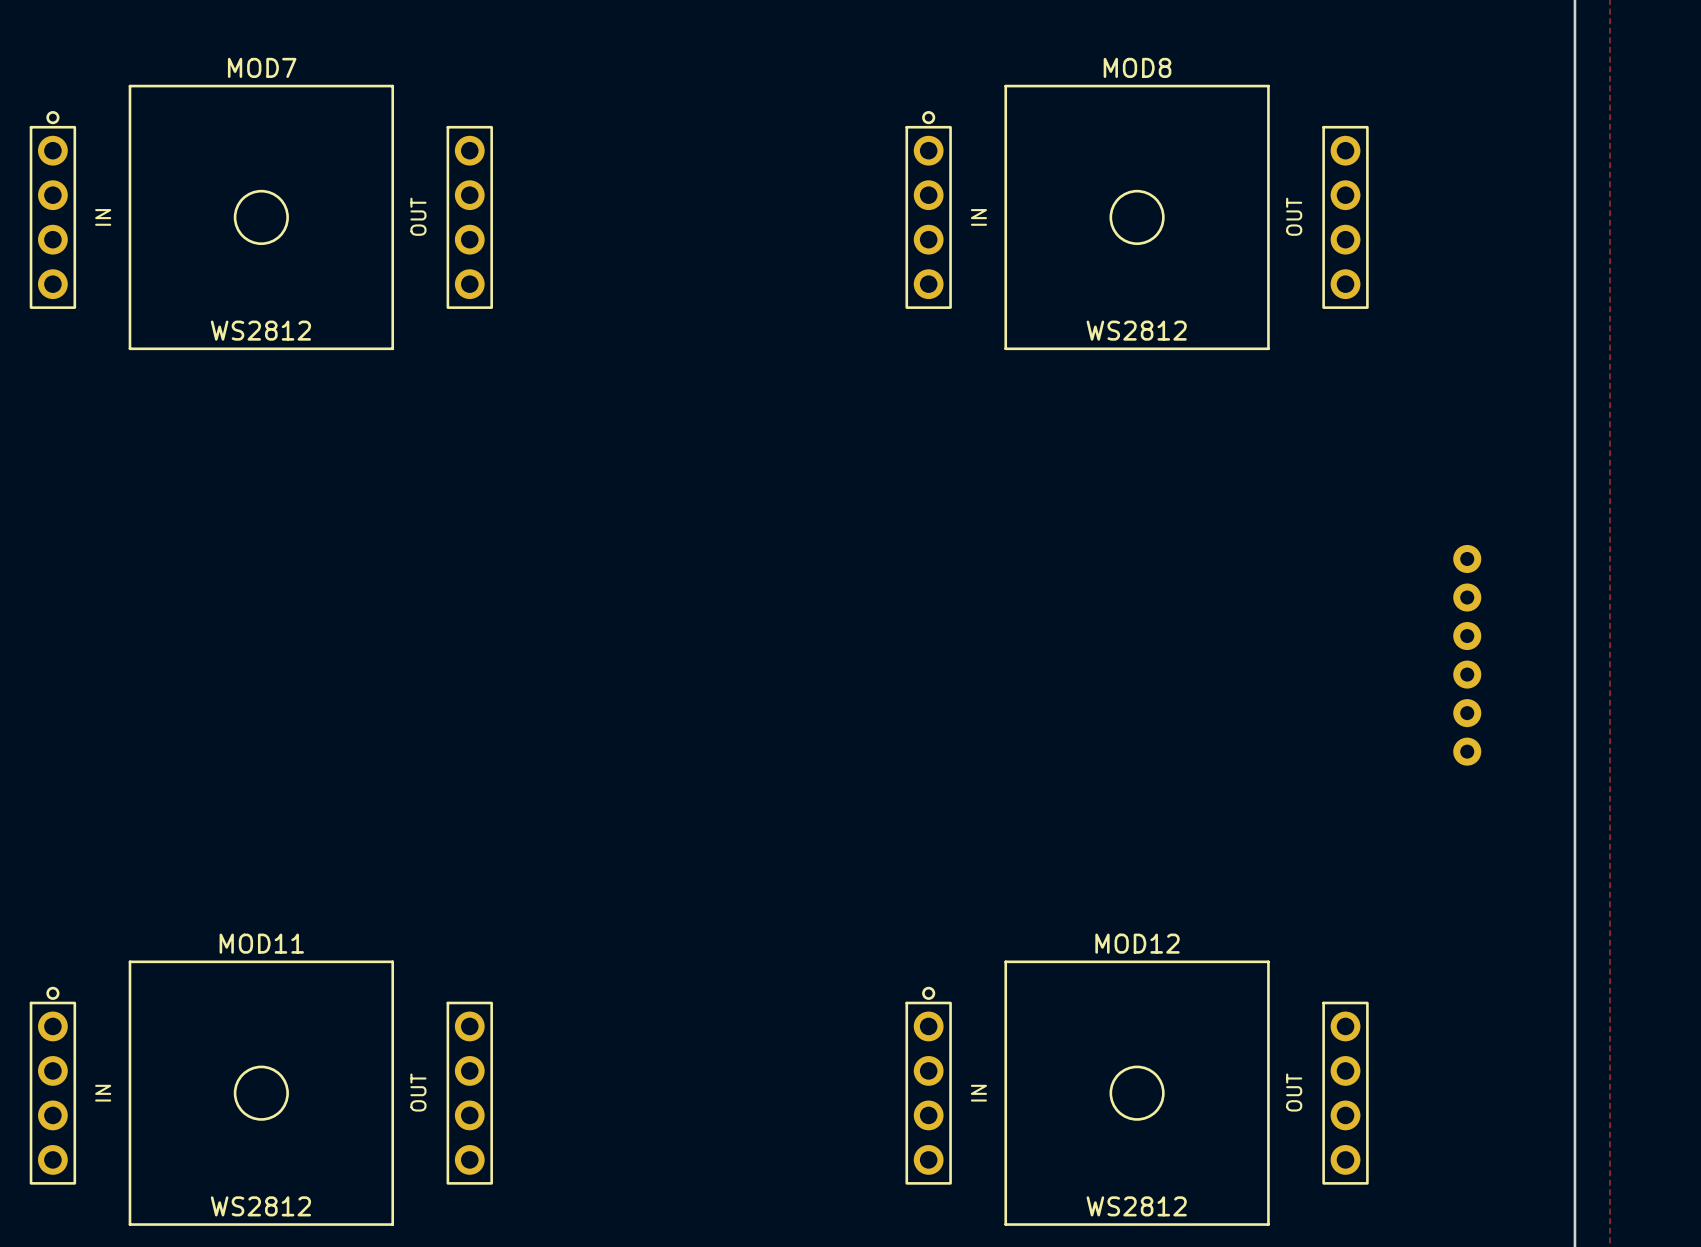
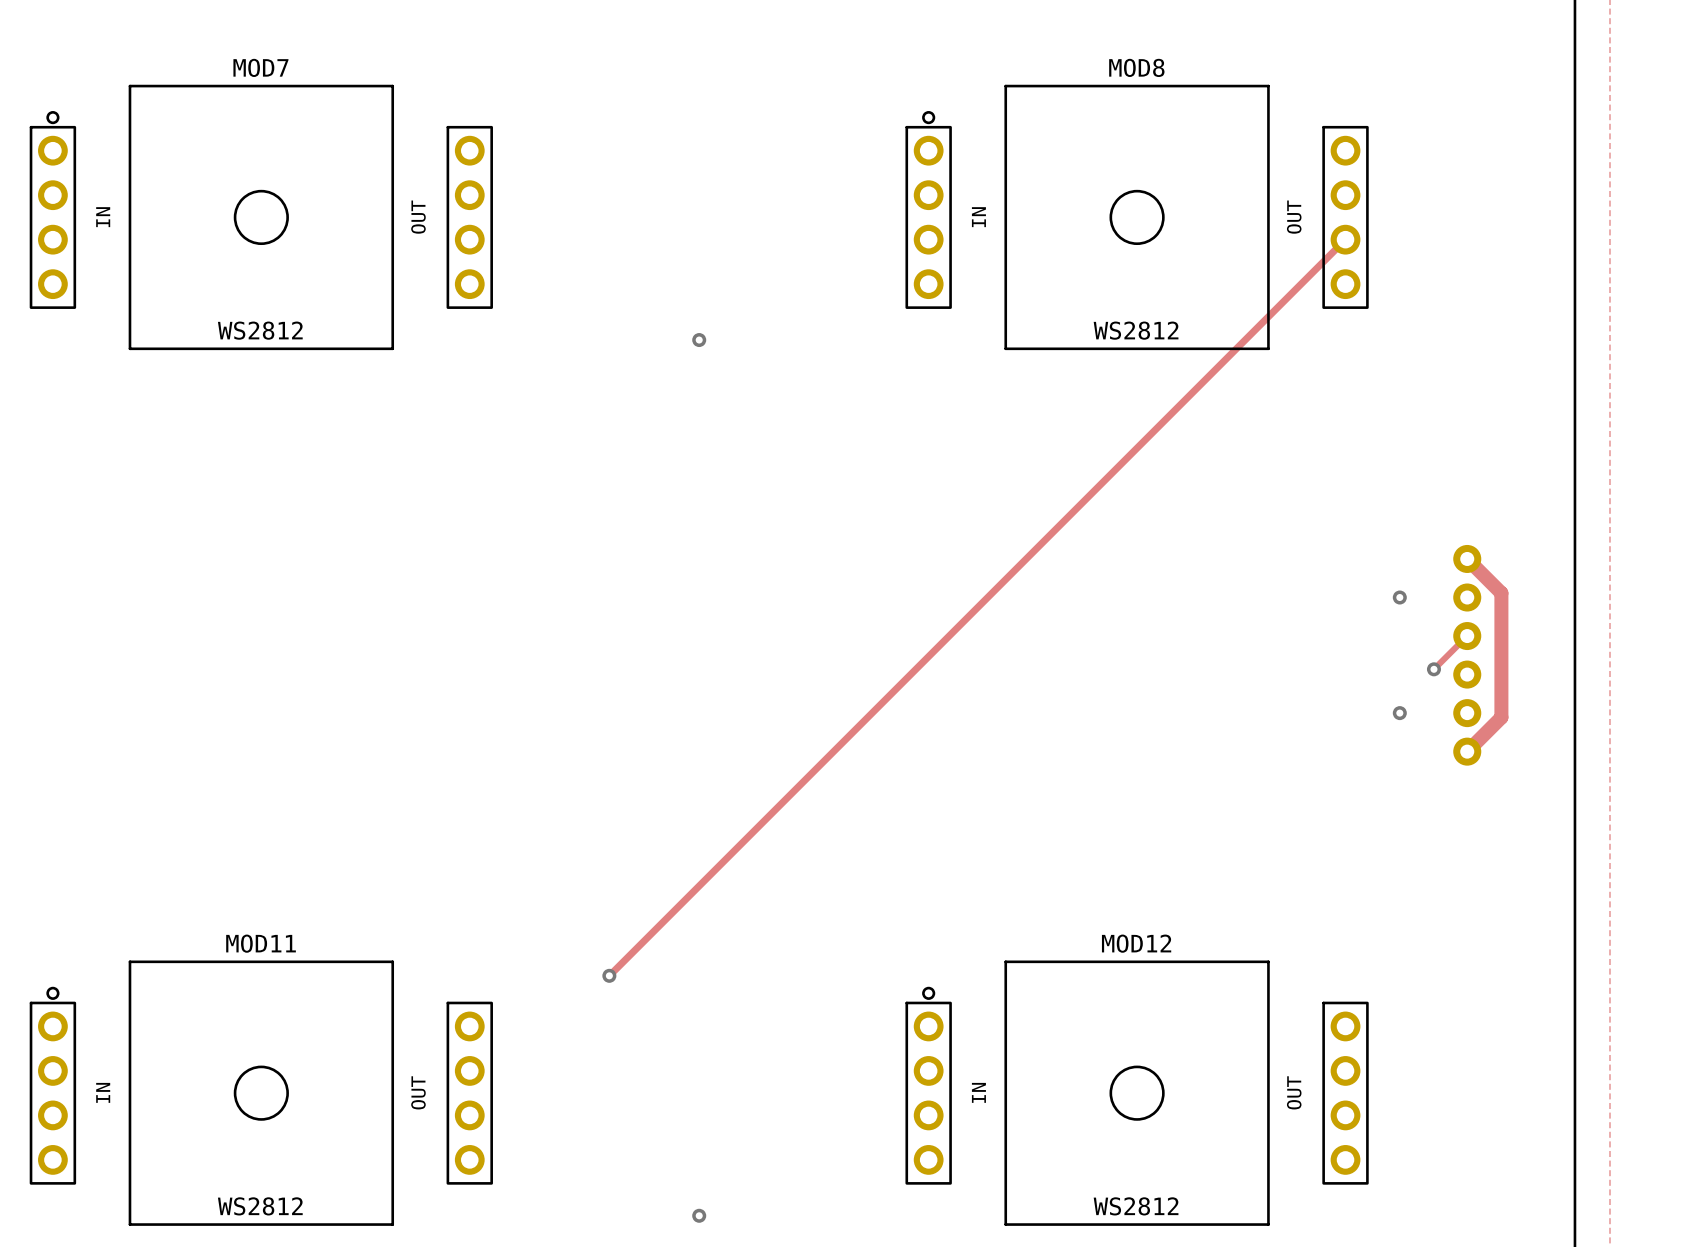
track: none -> (1345, 239) (609, 975)
via: none -> (699, 340)
track: none -> (1467, 558) (1501, 593) (1501, 717) (1467, 751)
via: none -> (1399, 597)
track: none -> (1467, 636) (1433, 669)
via: none -> (1433, 669)
via: none -> (1399, 713)
via: none -> (609, 975)
via: none -> (699, 1215)

